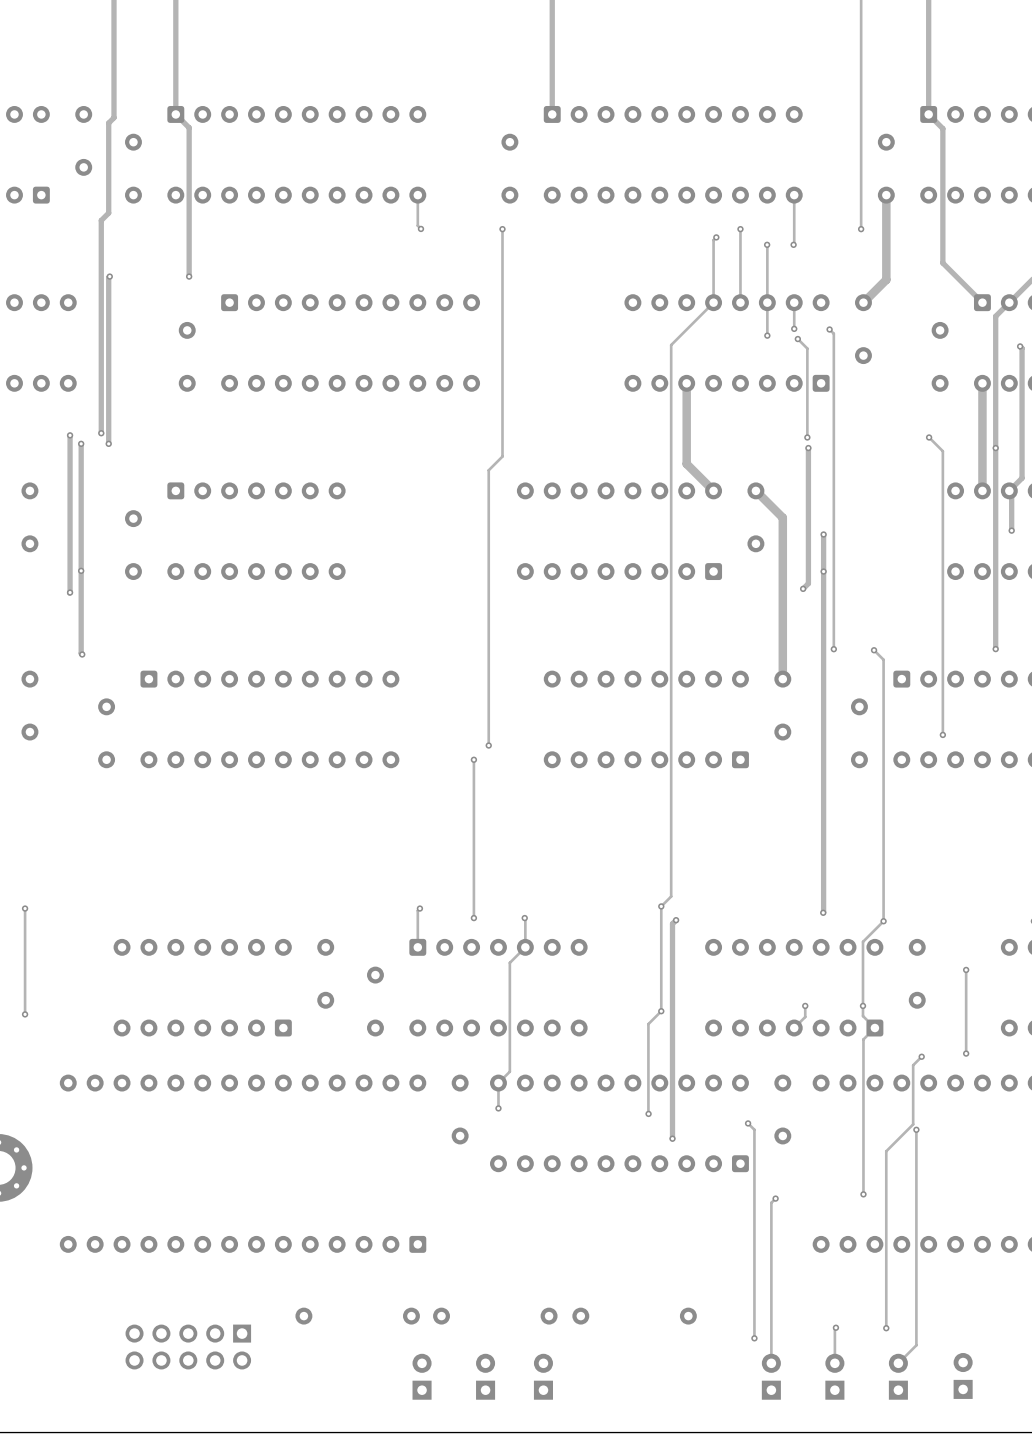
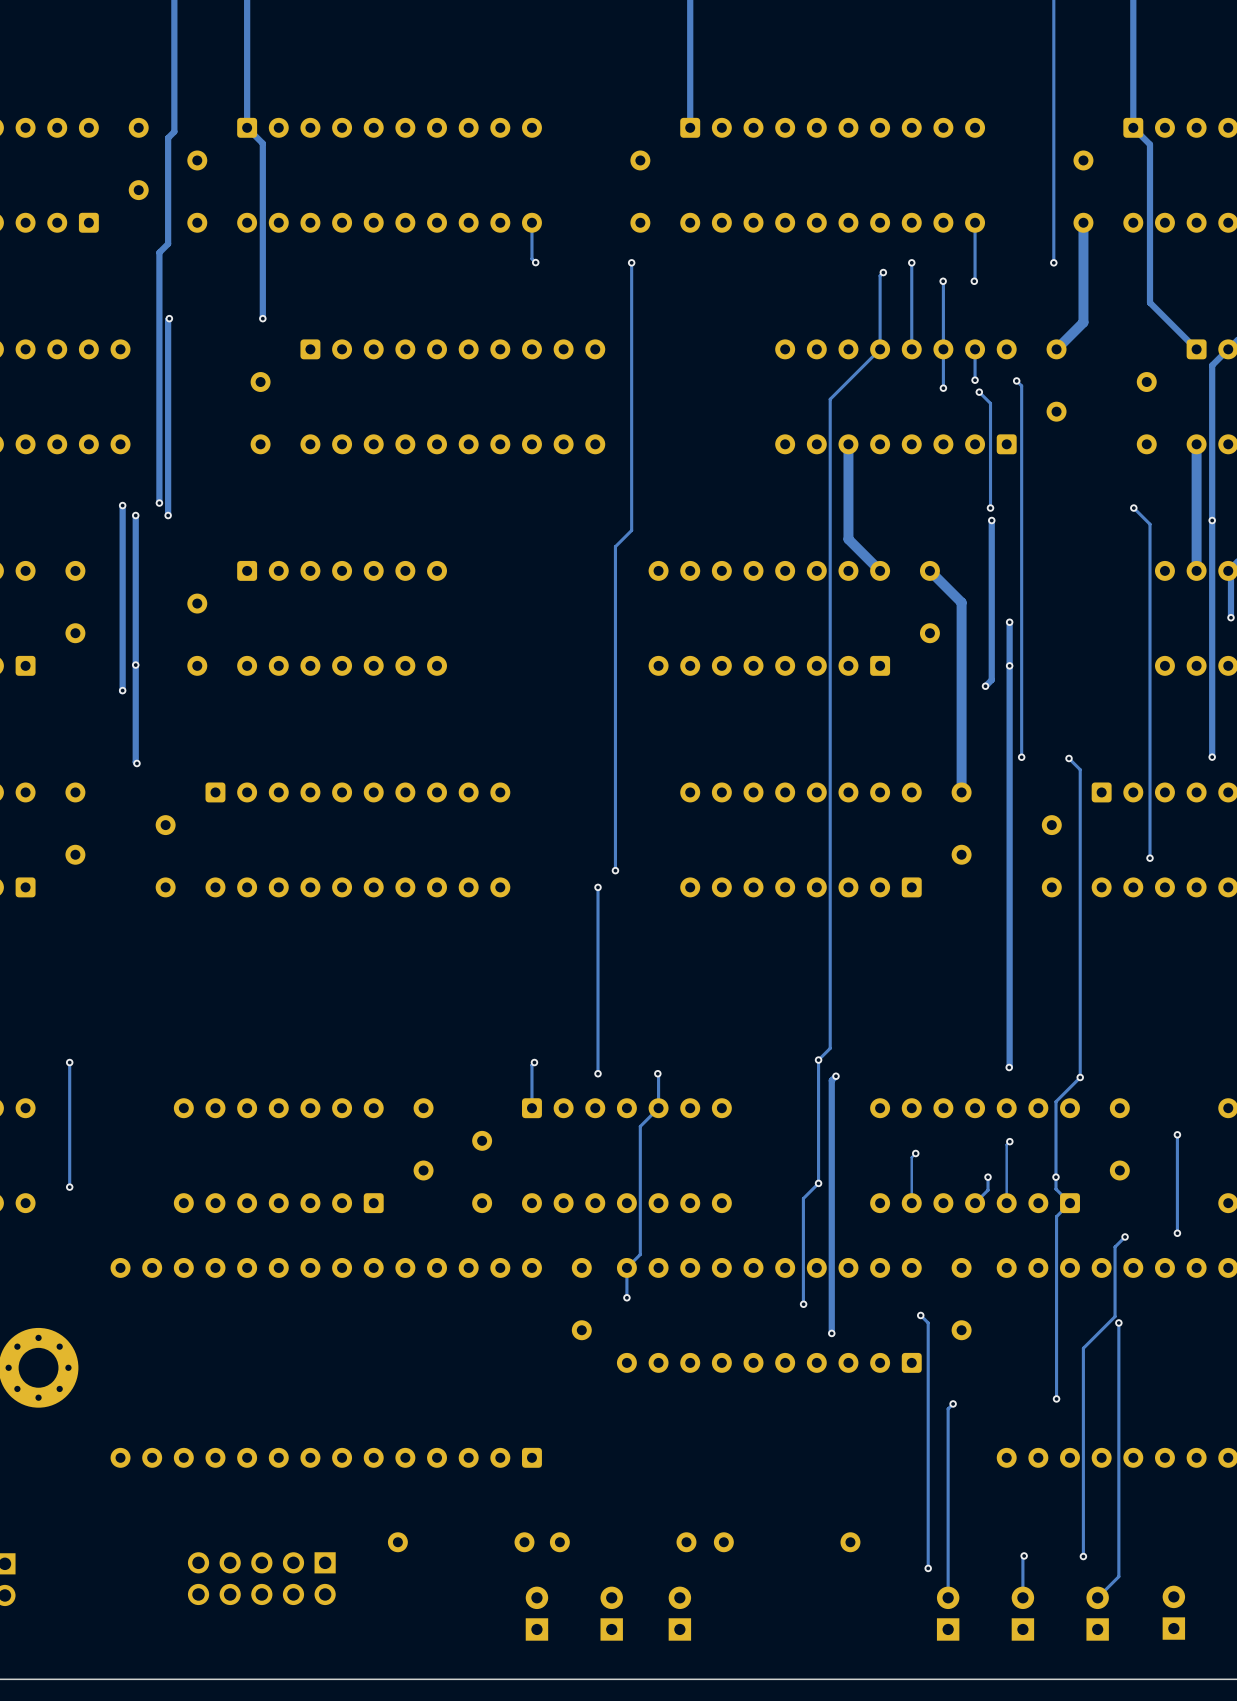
track: none -> (1009, 1141) (1006, 1144) (1006, 1203)
via: none -> (1009, 1141)
track: none -> (915, 1153) (911, 1157) (911, 1203)
via: none -> (915, 1153)

